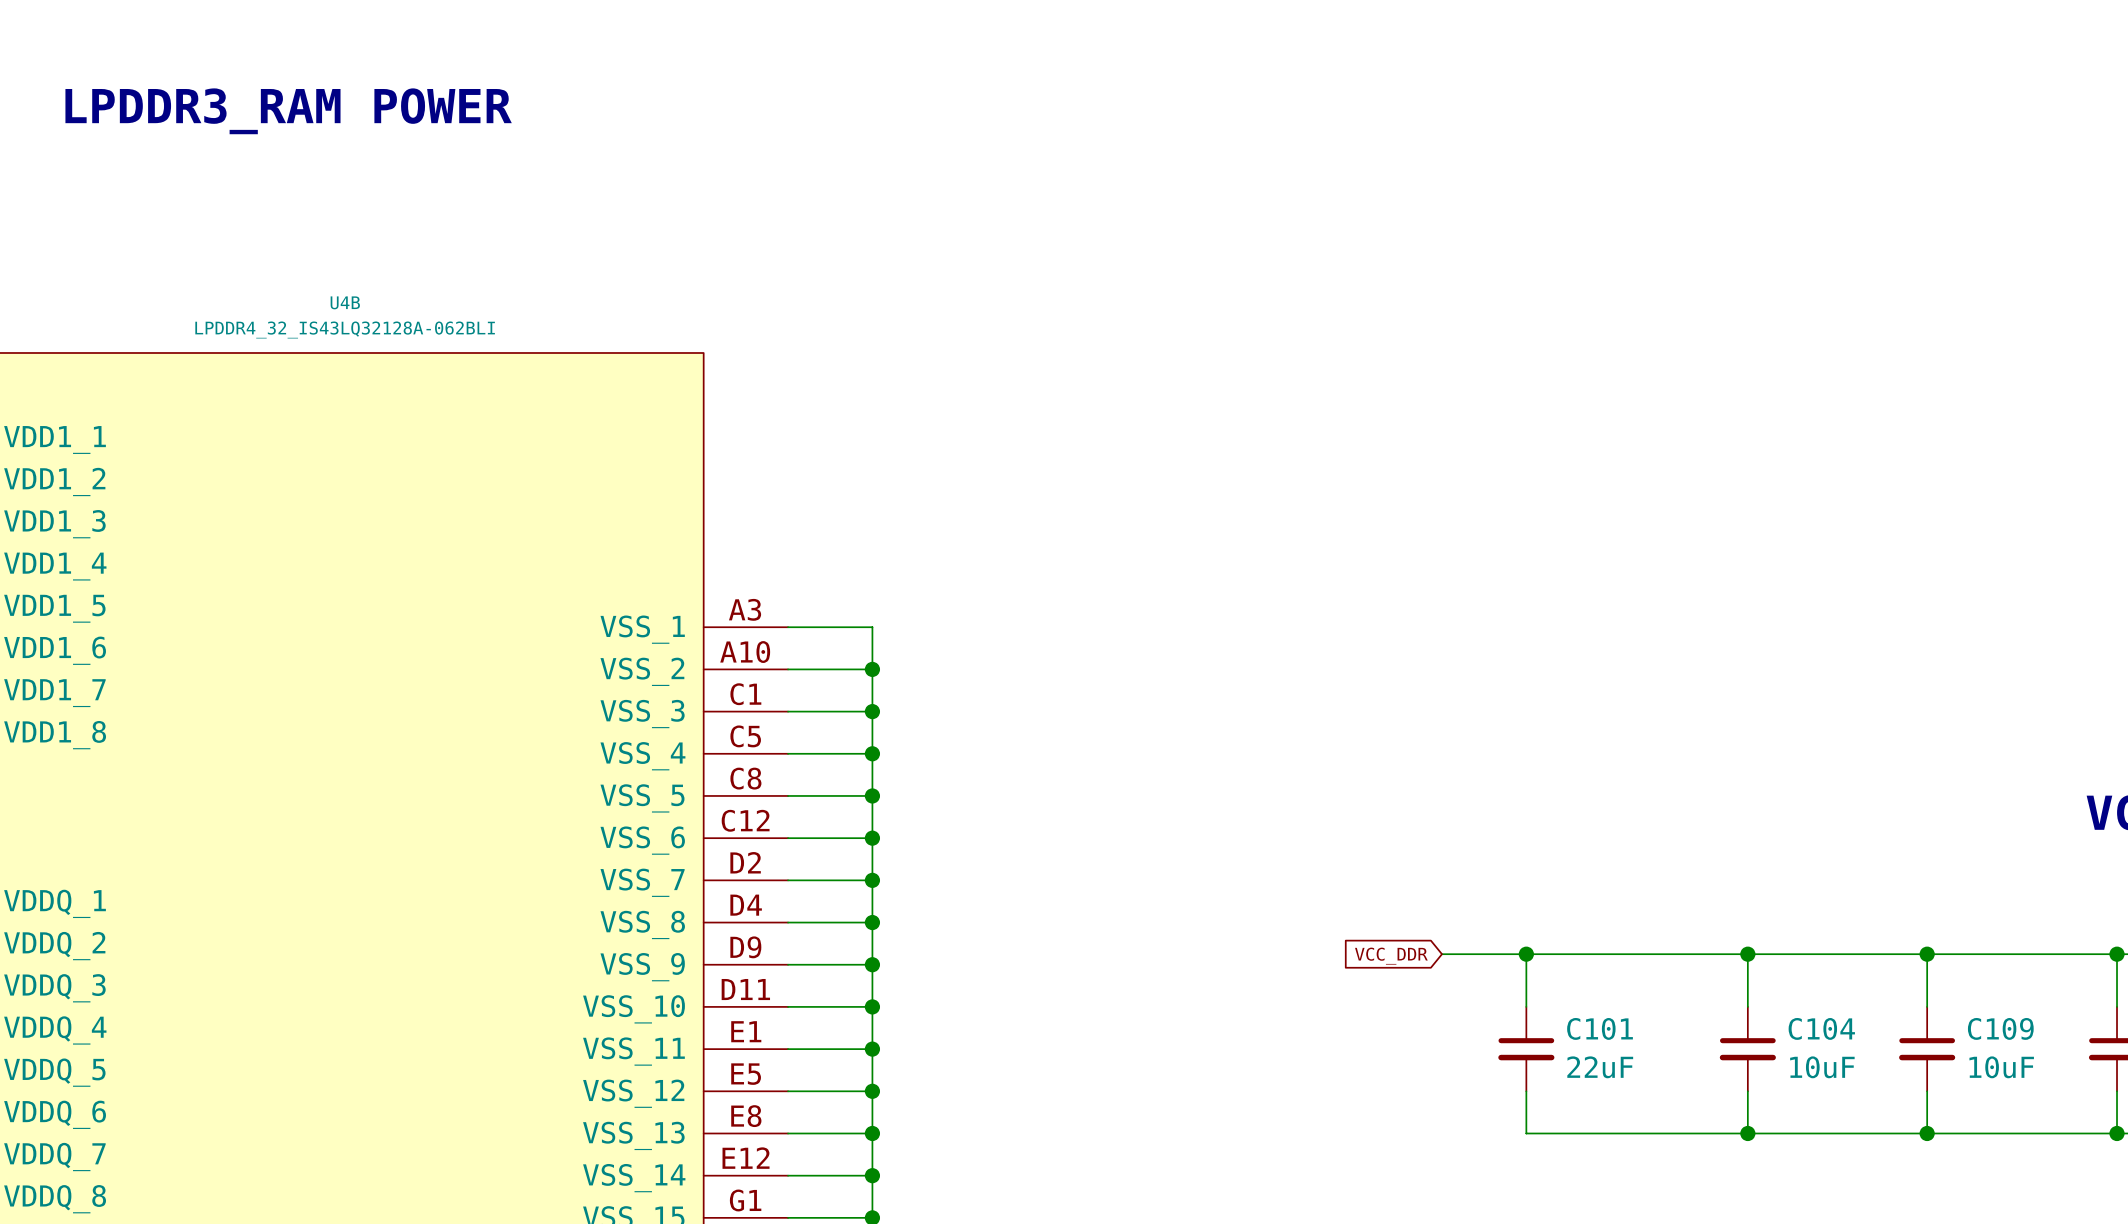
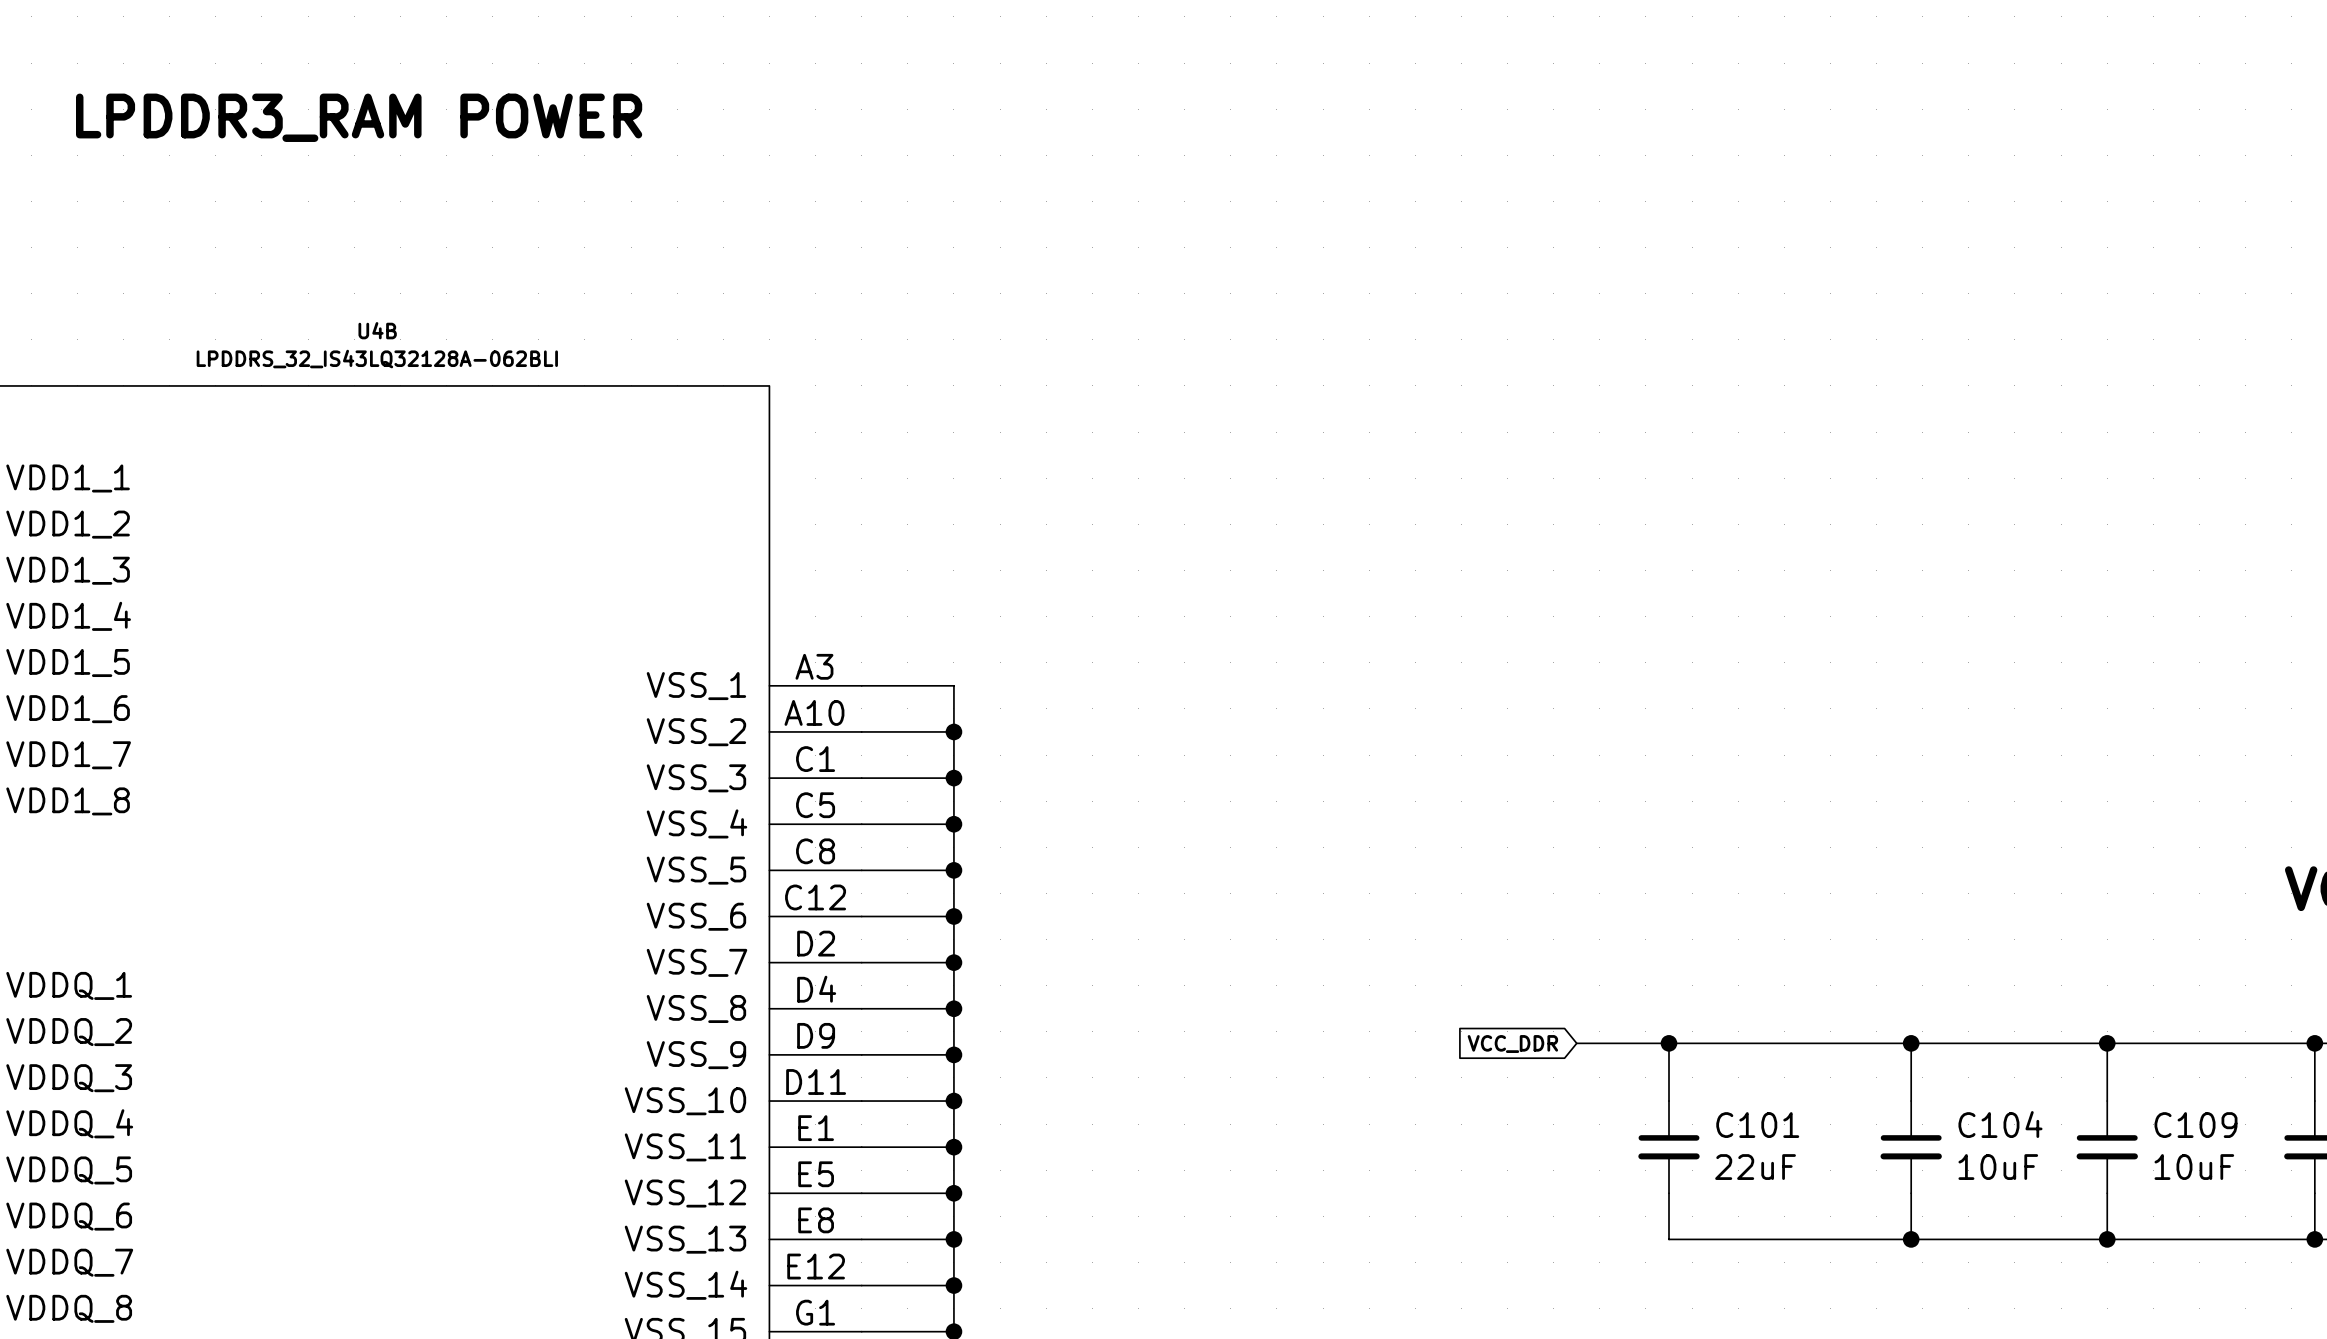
U4B value: LPDDR4_32_IS43LQ32128A-062BLI (345, 329) -> LPDDRS_32_IS43LQ32128A-062BLI (377, 359)

